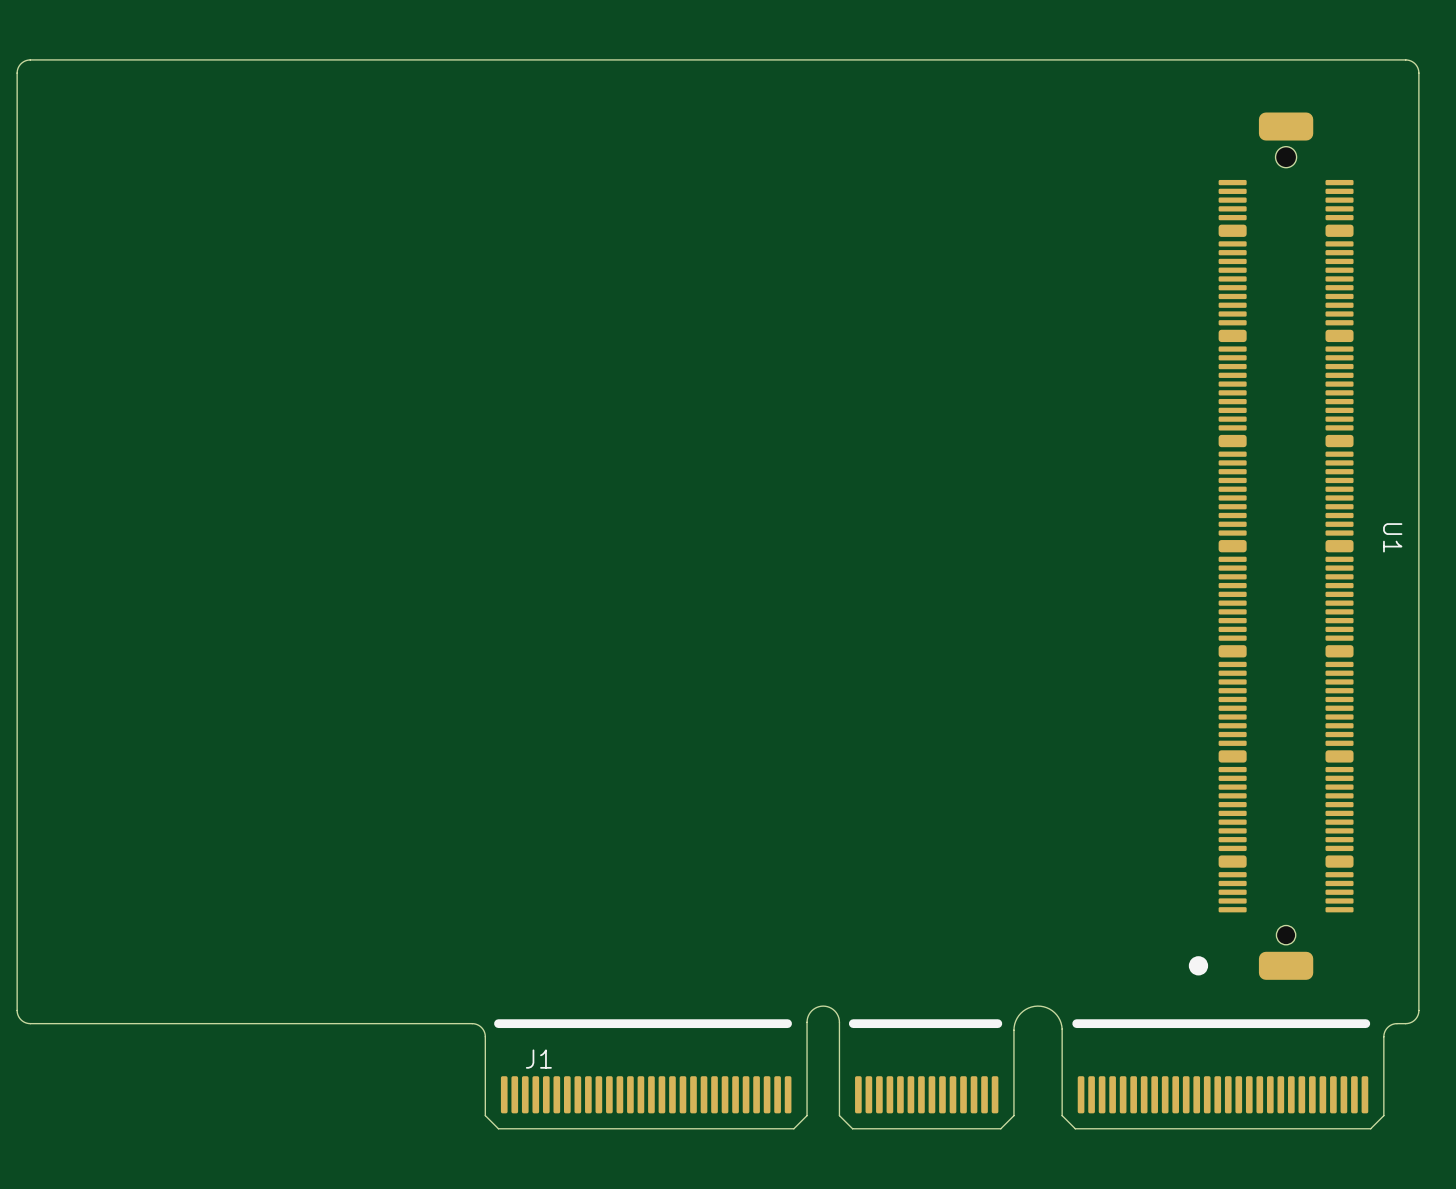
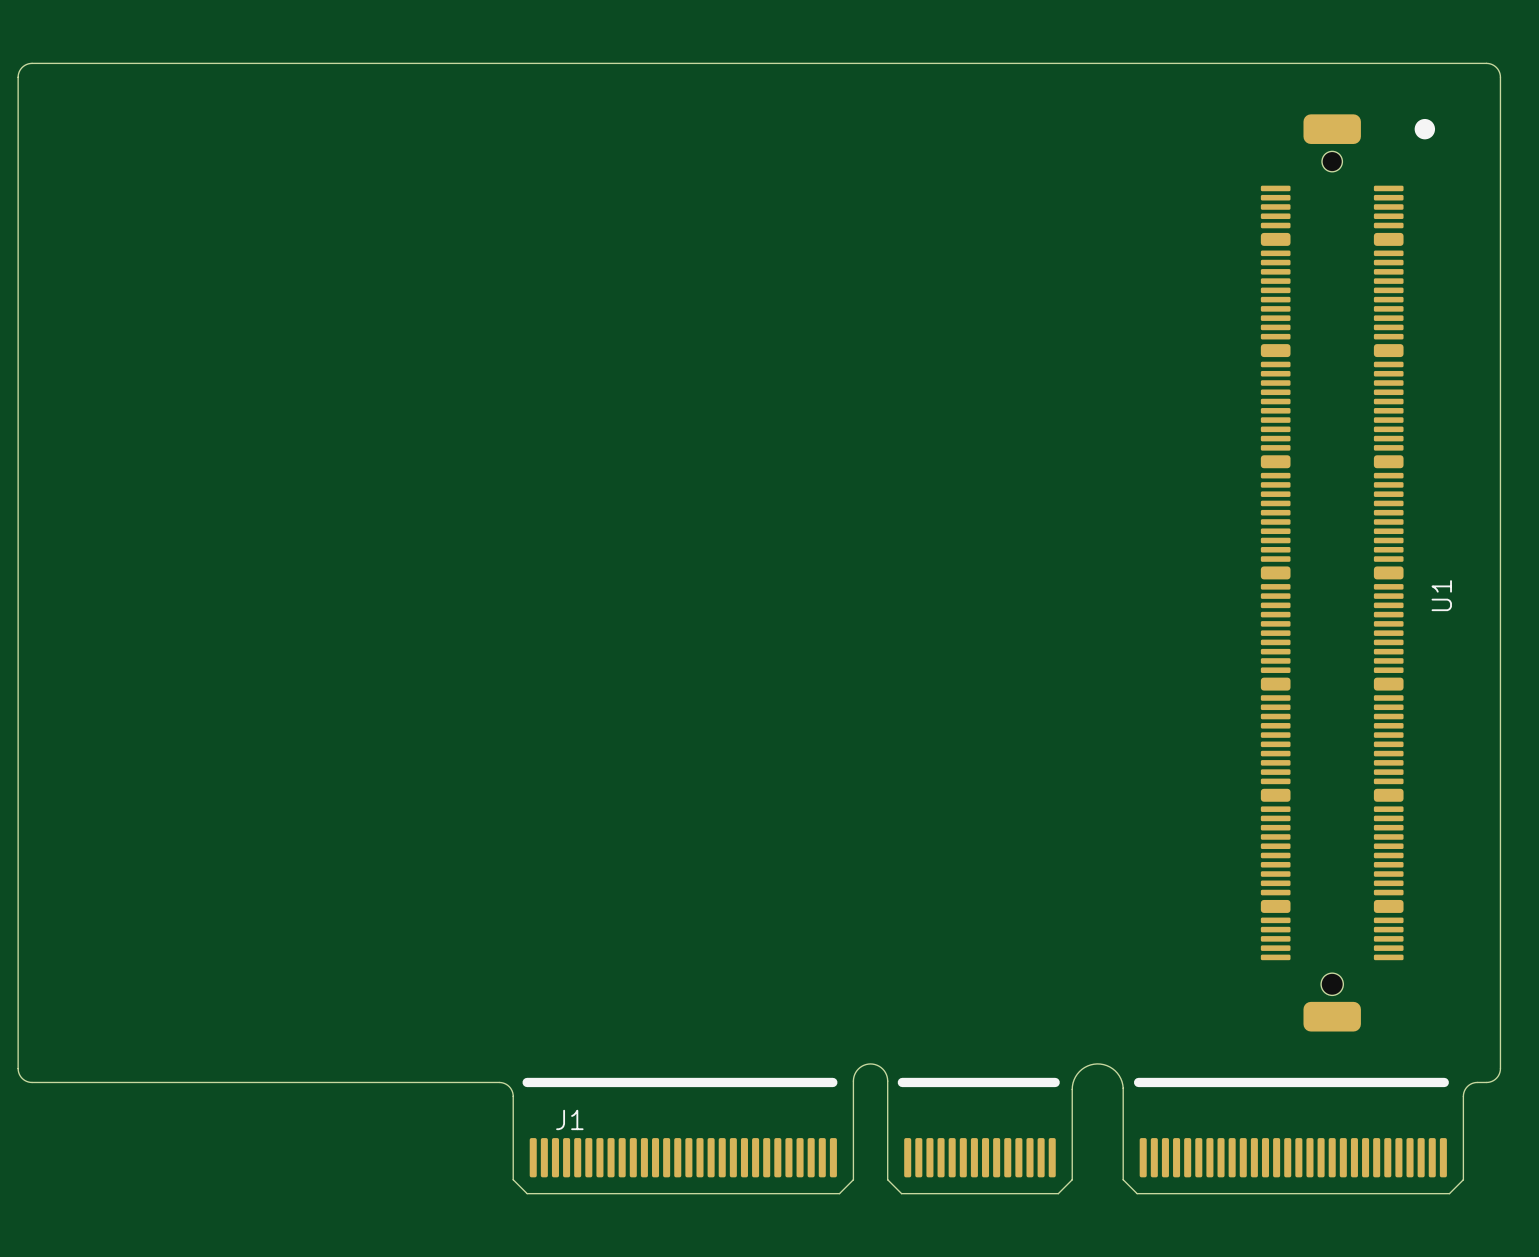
U1 name position: U1 (1392, 537) -> U1 (1441, 595)
U1 rotation: 0° (1271, 546) -> 180° (1347, 572)

